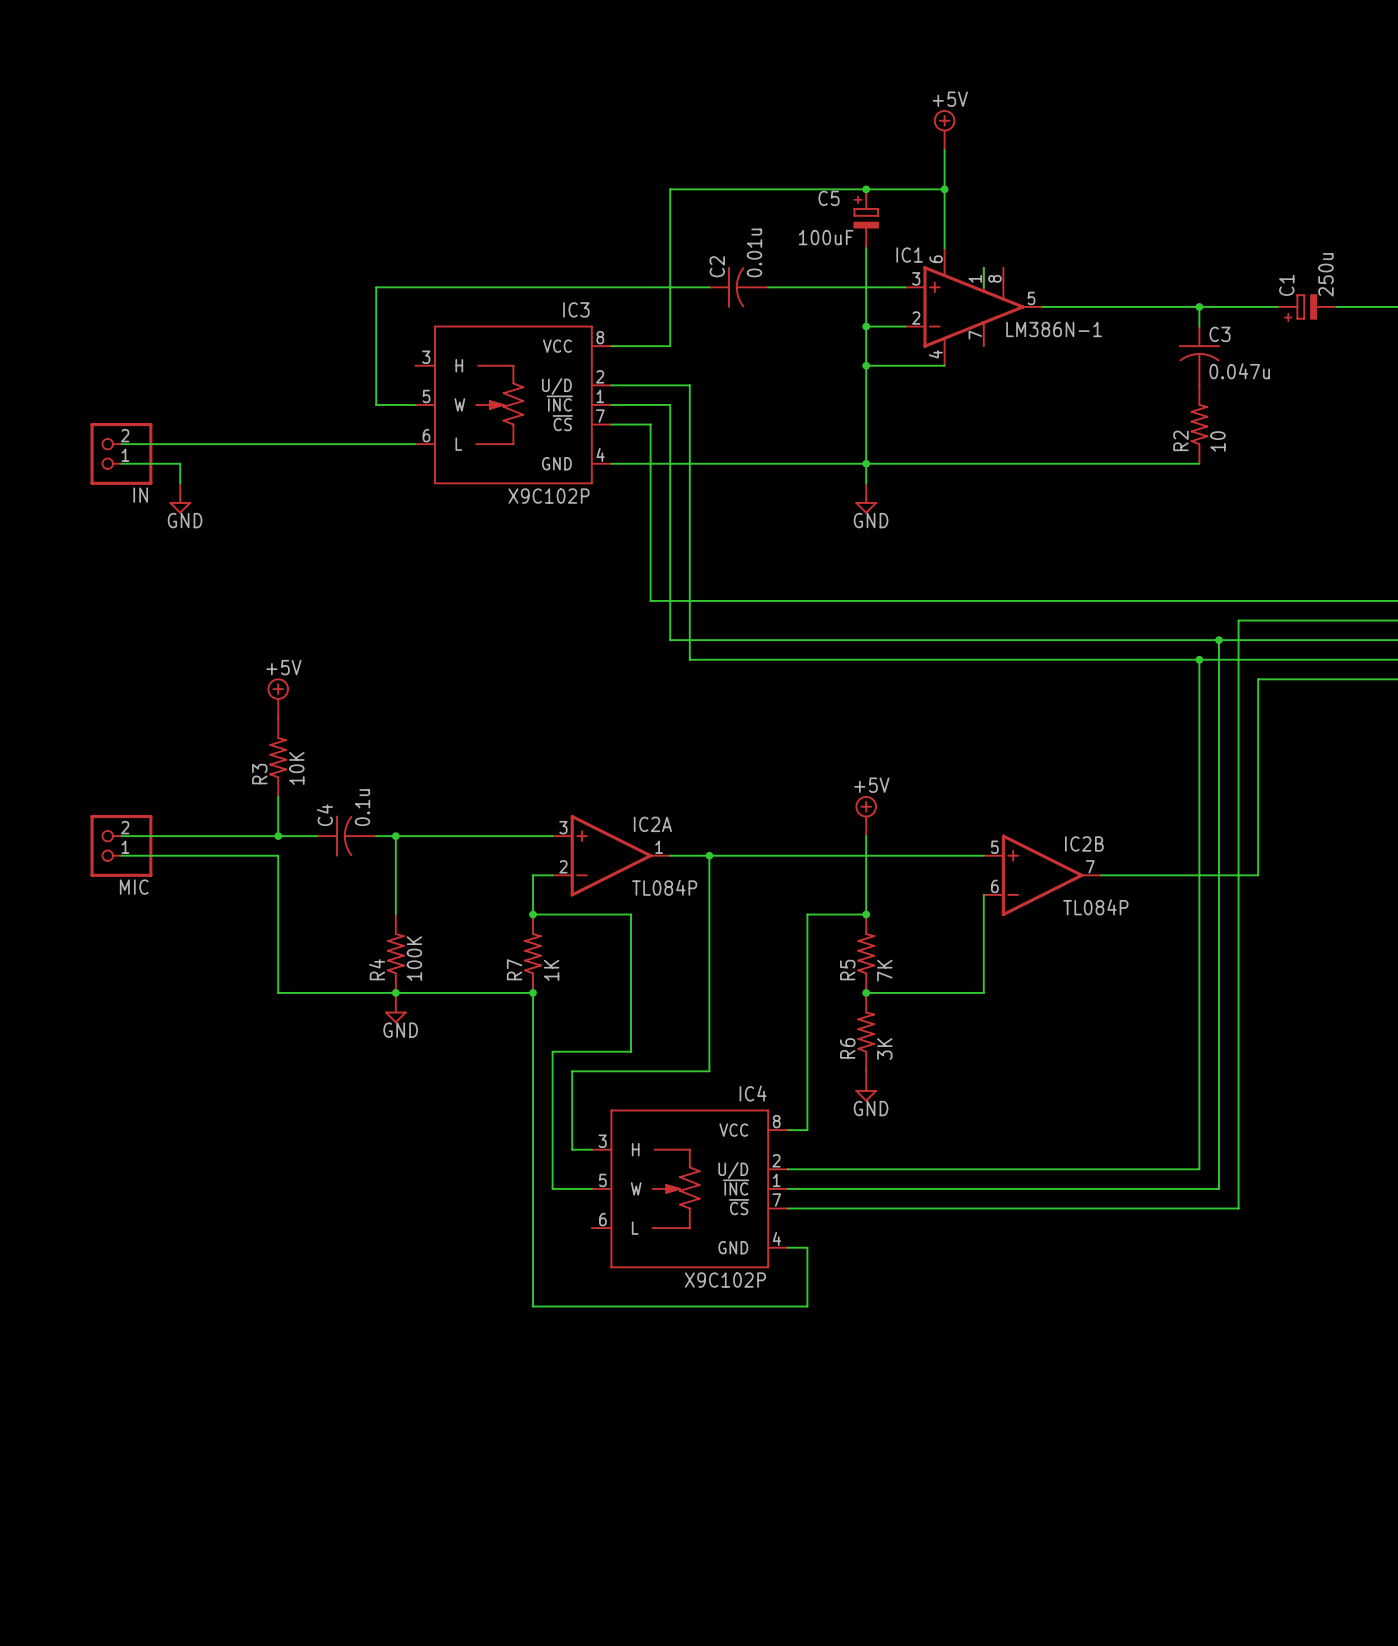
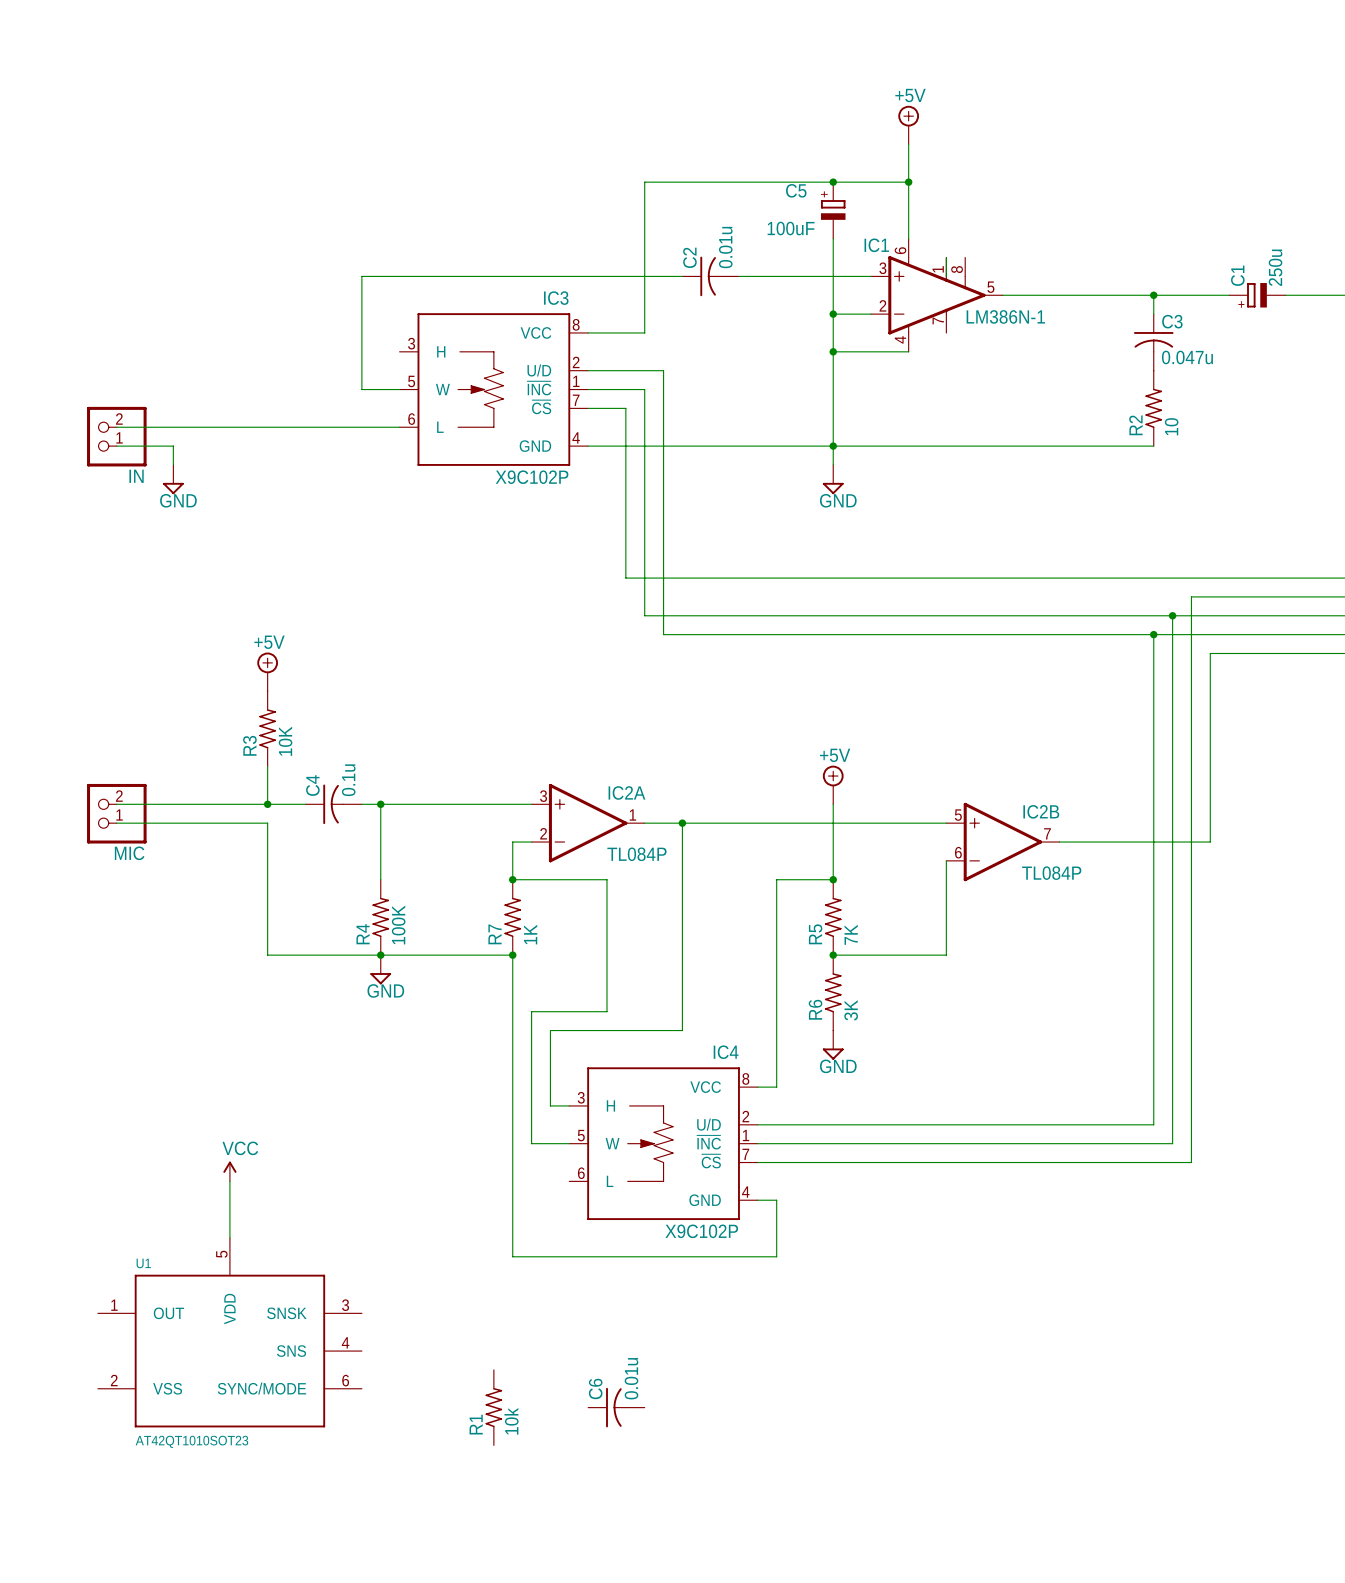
power symbol: none -> VCC (229, 1171)
wire: none -> (229, 1181) (229, 1237)
U1: none -> AT42QT1010SOT23 (229, 1332)
R1: none -> 10k (493, 1407)
C6: none -> 0.01u (616, 1407)

